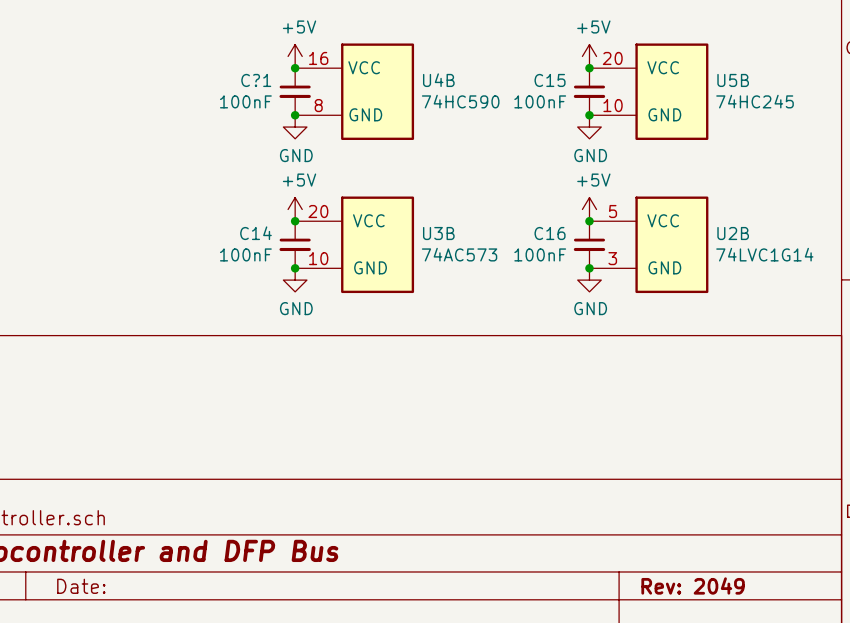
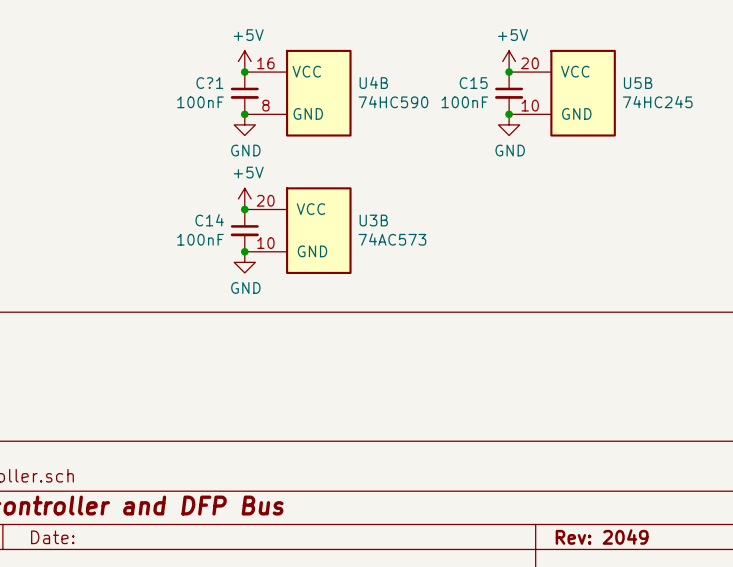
power symbol: +5V (589, 209) -> none
junction: (589, 221) -> none
C16: 100nF (589, 244) -> none
U2B: 74LVC1G14 (648, 244) -> none
junction: (589, 268) -> none
power symbol: GND (589, 280) -> none

